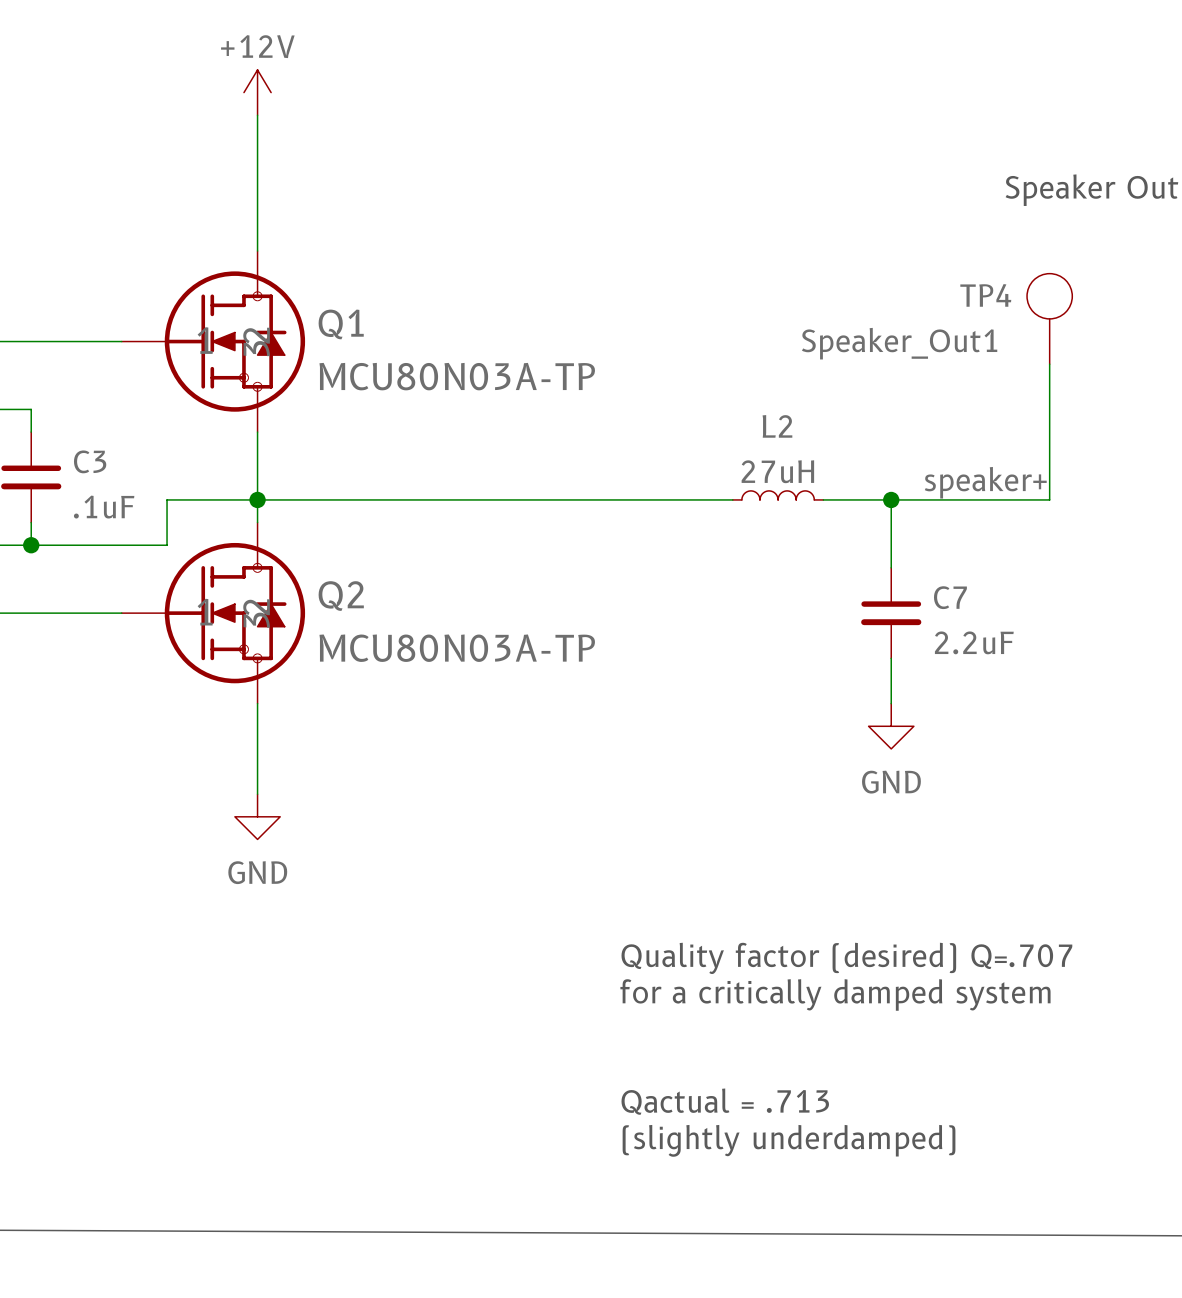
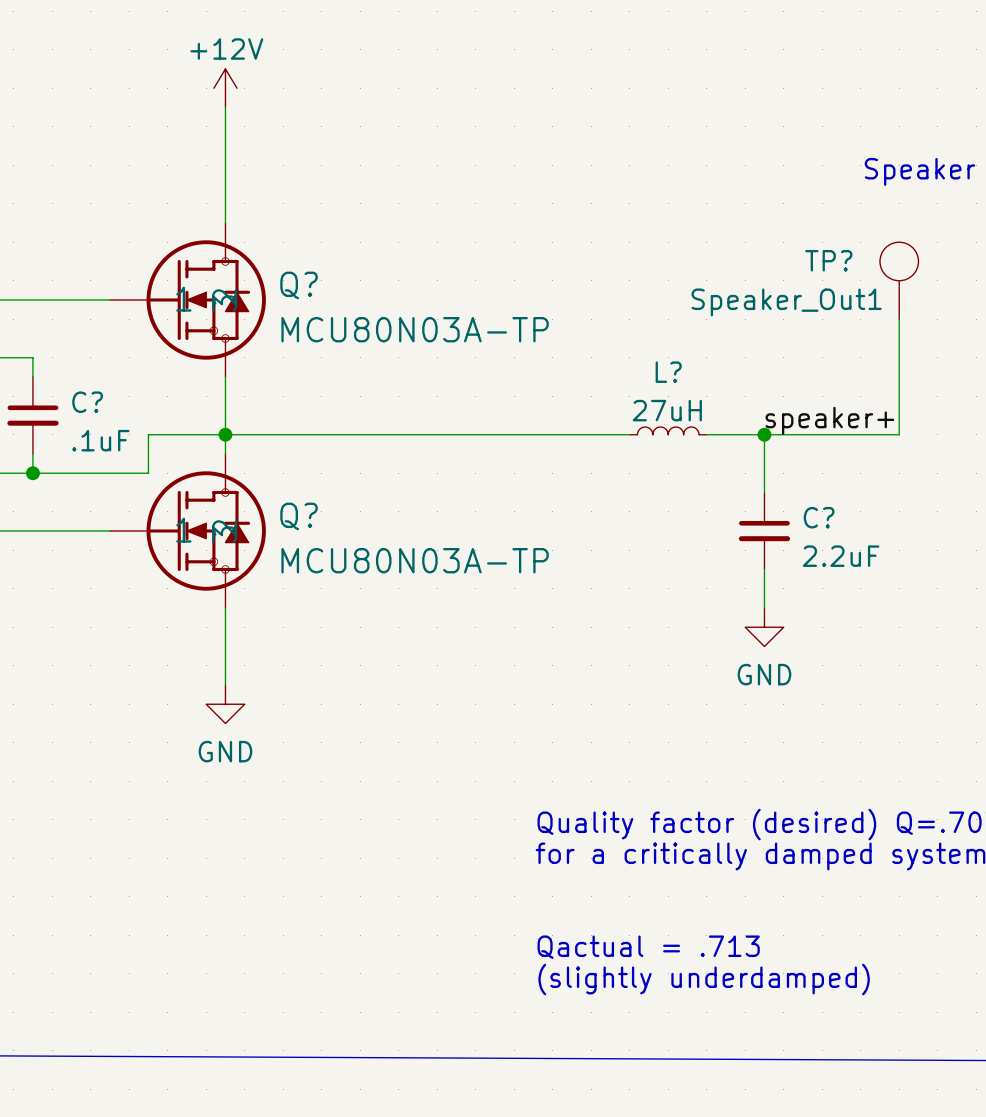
TP4 name: TP4 (985, 295) -> TP? (828, 260)
Q1 name: Q1 (341, 324) -> Q? (299, 285)
L2 name: L2 (777, 426) -> L? (668, 372)
C3 name: C3 (90, 461) -> C? (87, 402)
Q2 name: Q2 (341, 596) -> Q? (299, 516)
C7 name: C7 (950, 597) -> C? (819, 517)

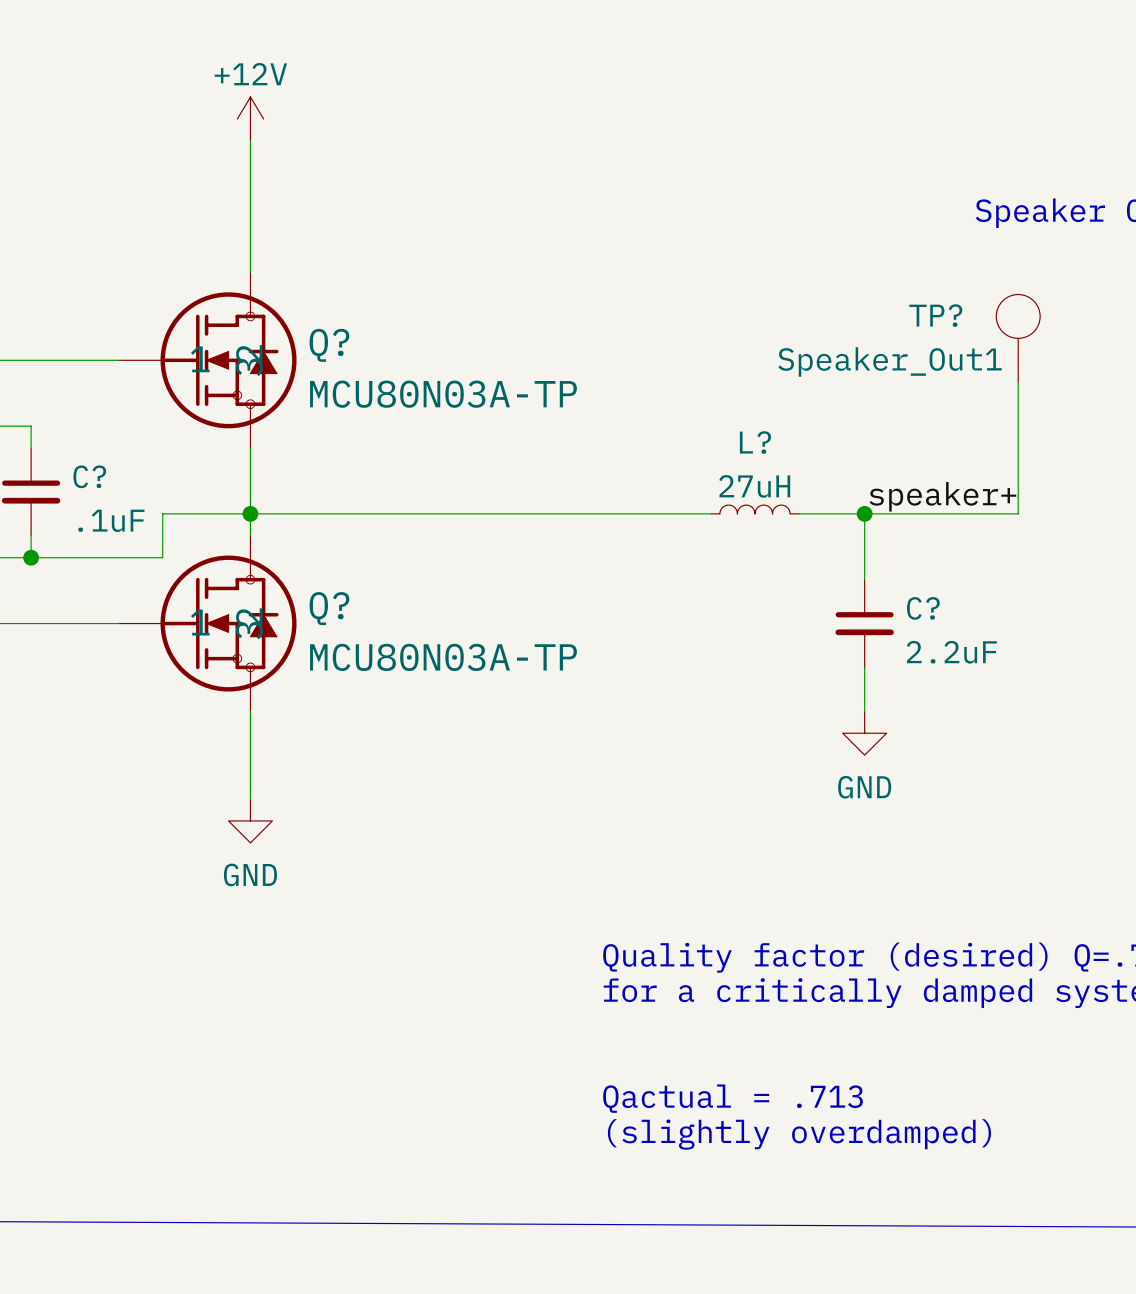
text: (slightly underdamped) (704, 979) -> (slightly overdamped) (799, 1134)

